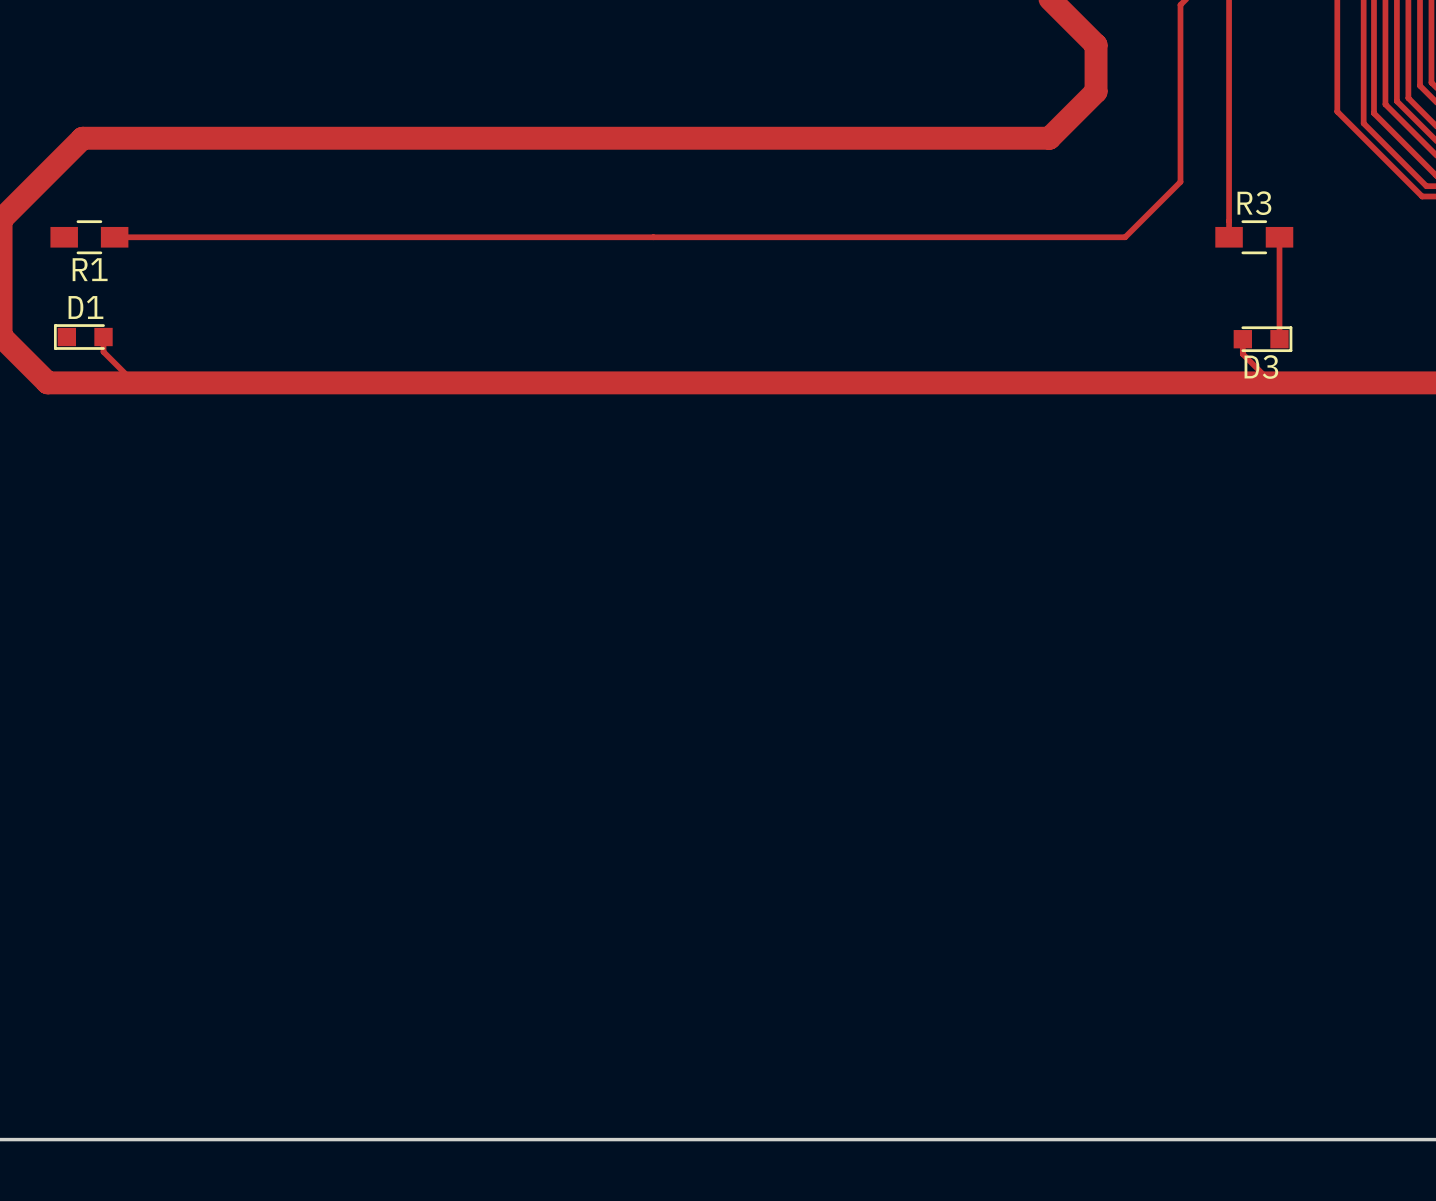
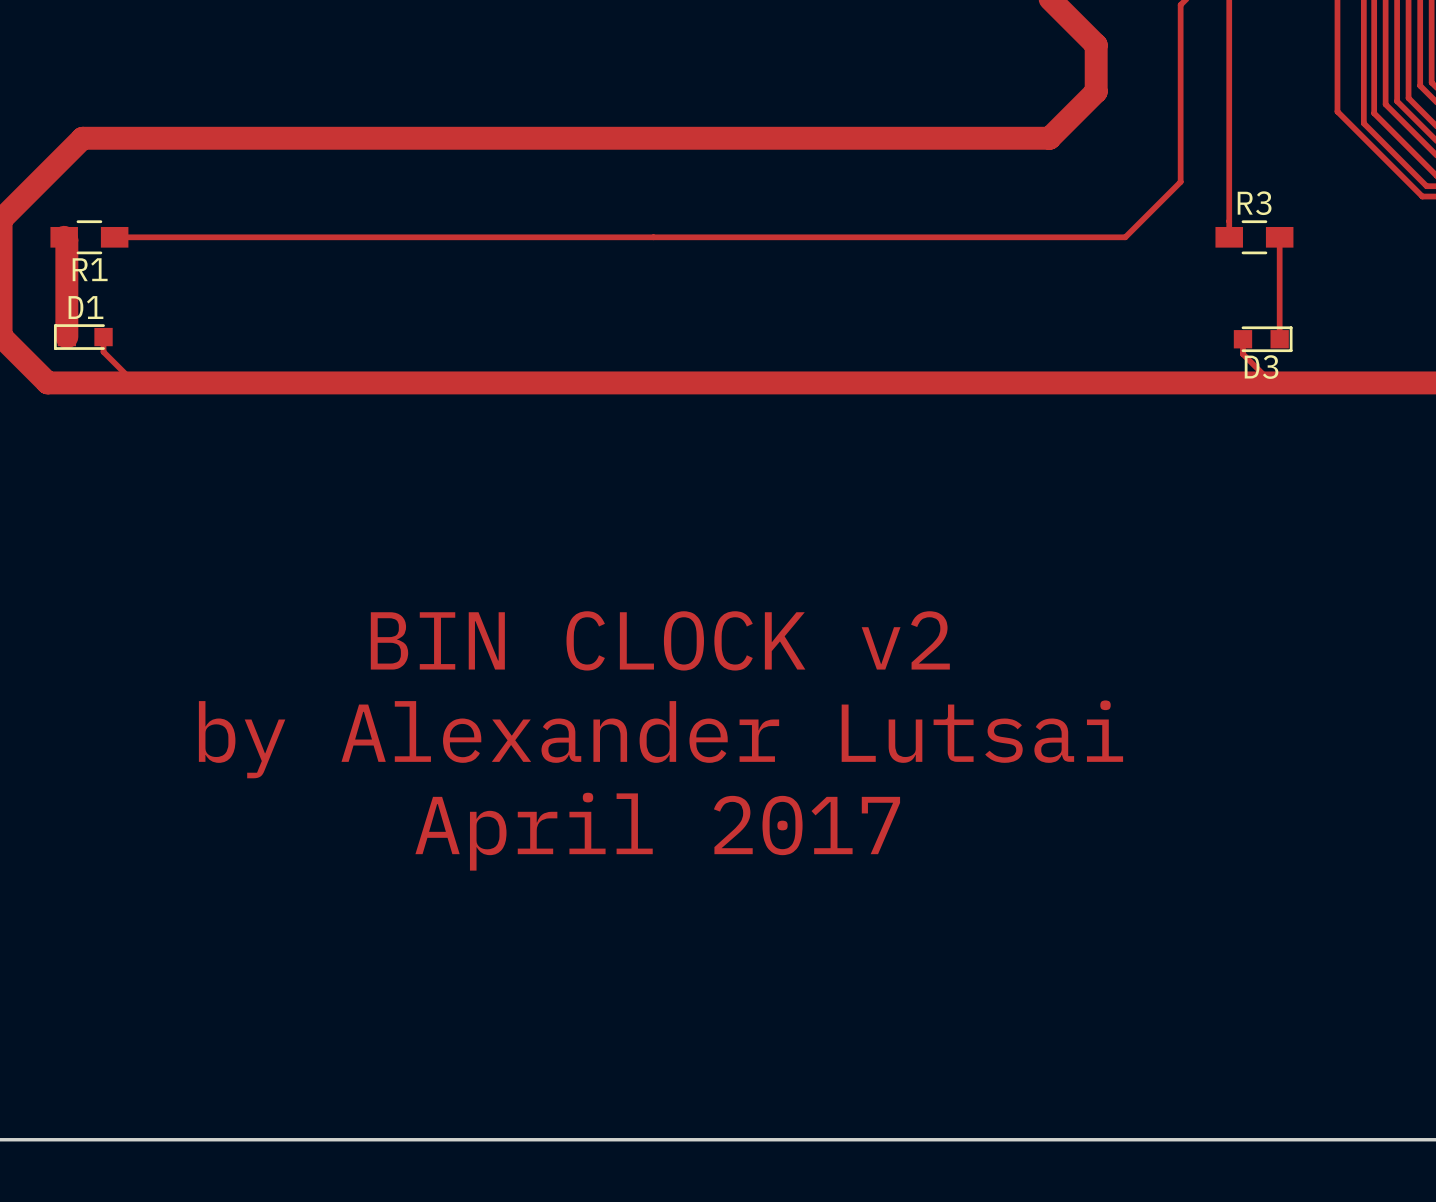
track: none -> (64, 237) (66, 239) (66, 337)
text: none -> BIN CLOCK v2 (660, 640)
text: none -> by Alexander Lutsai (660, 739)
text: none -> April 2017 (657, 831)

